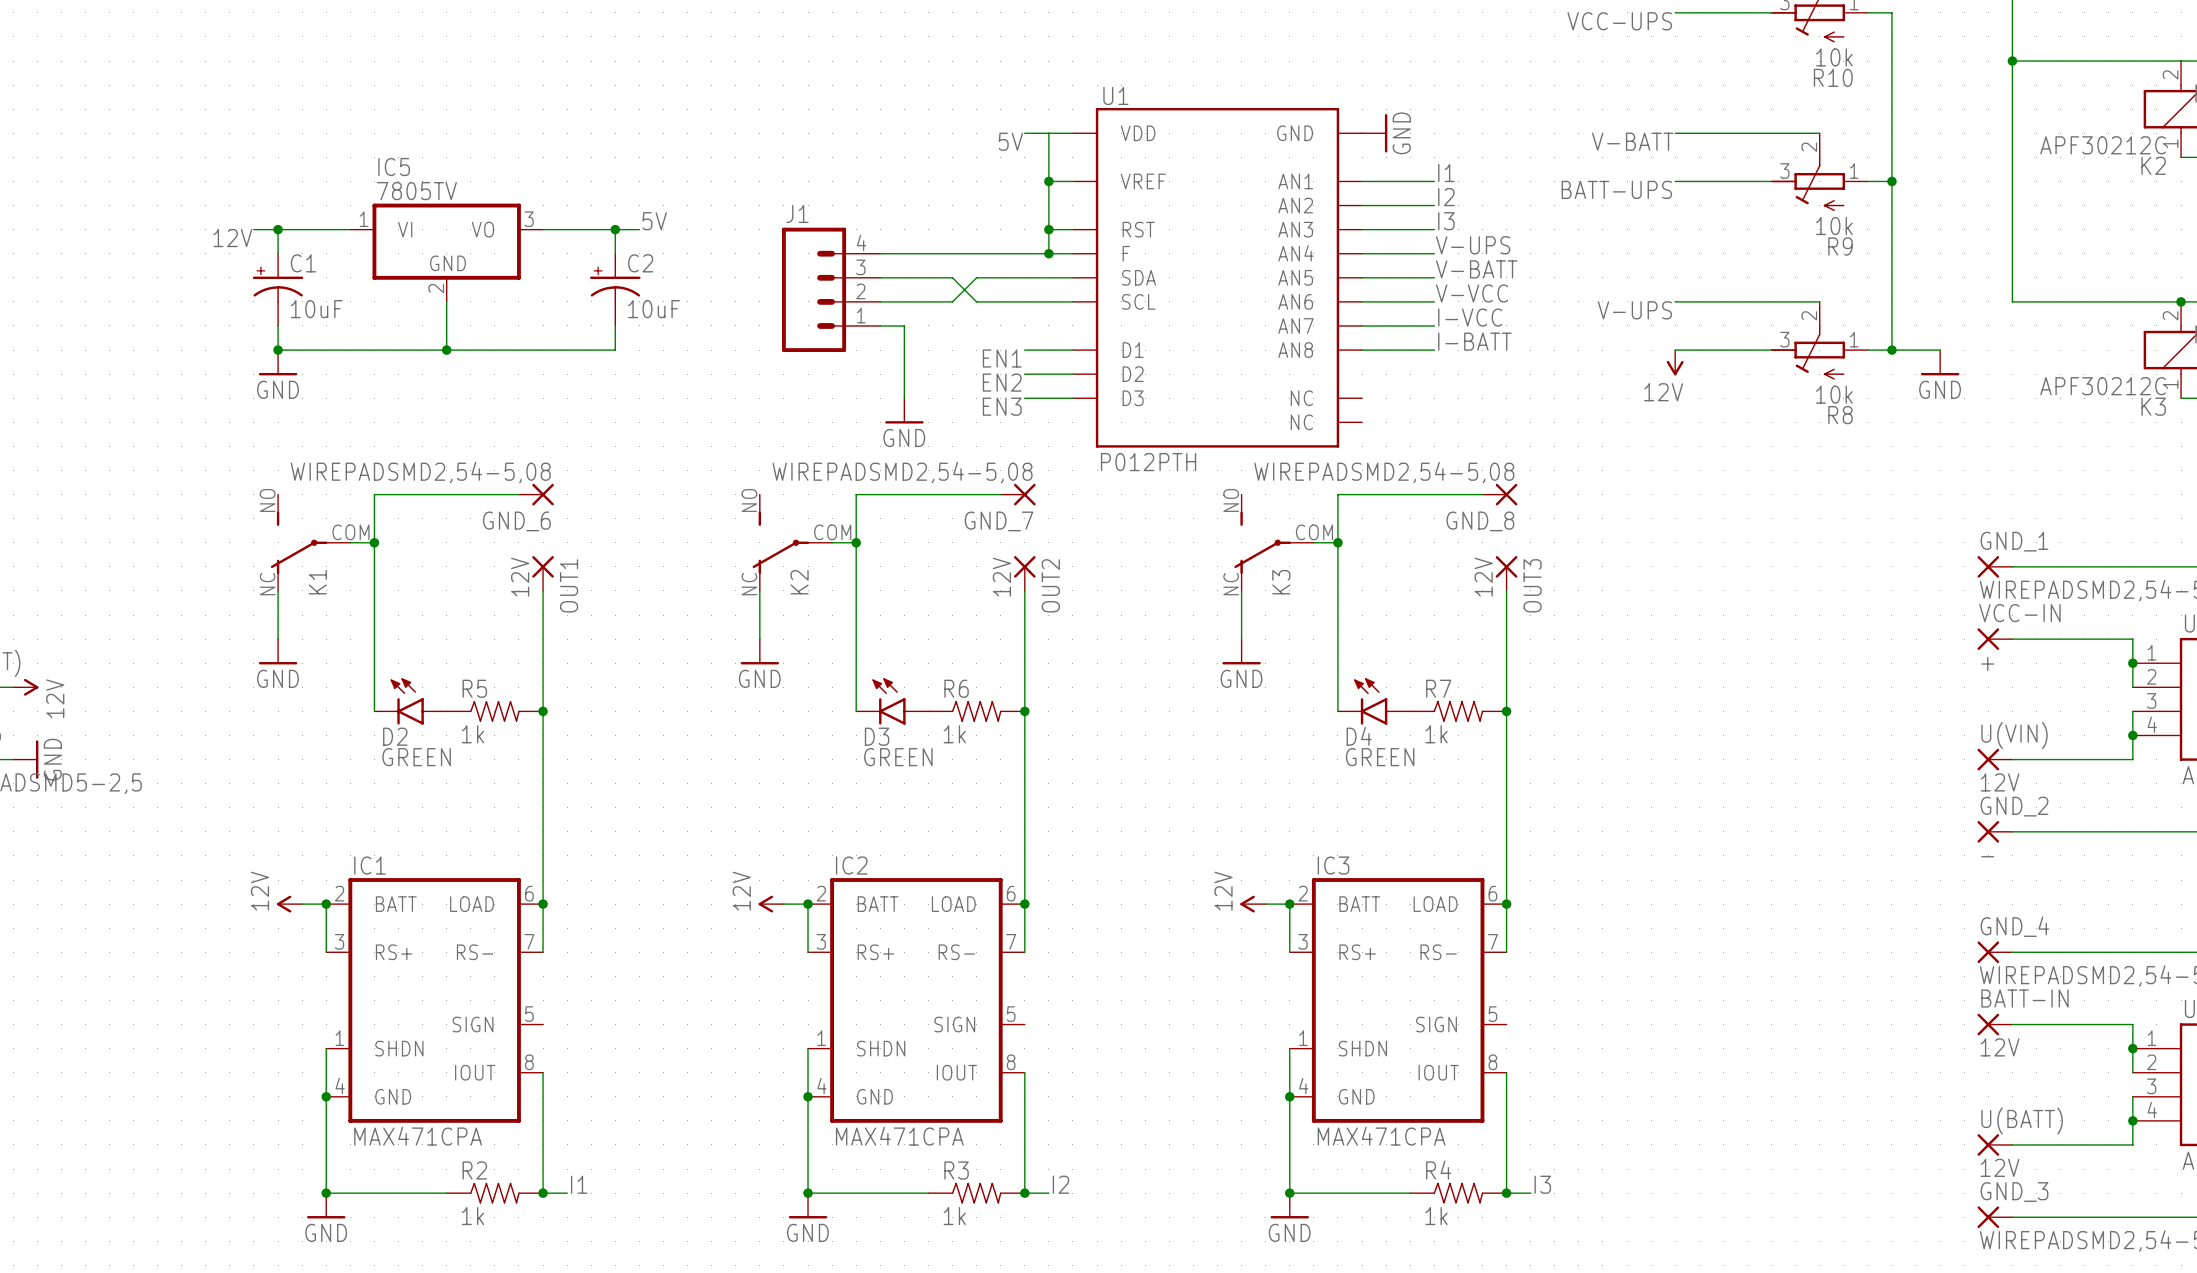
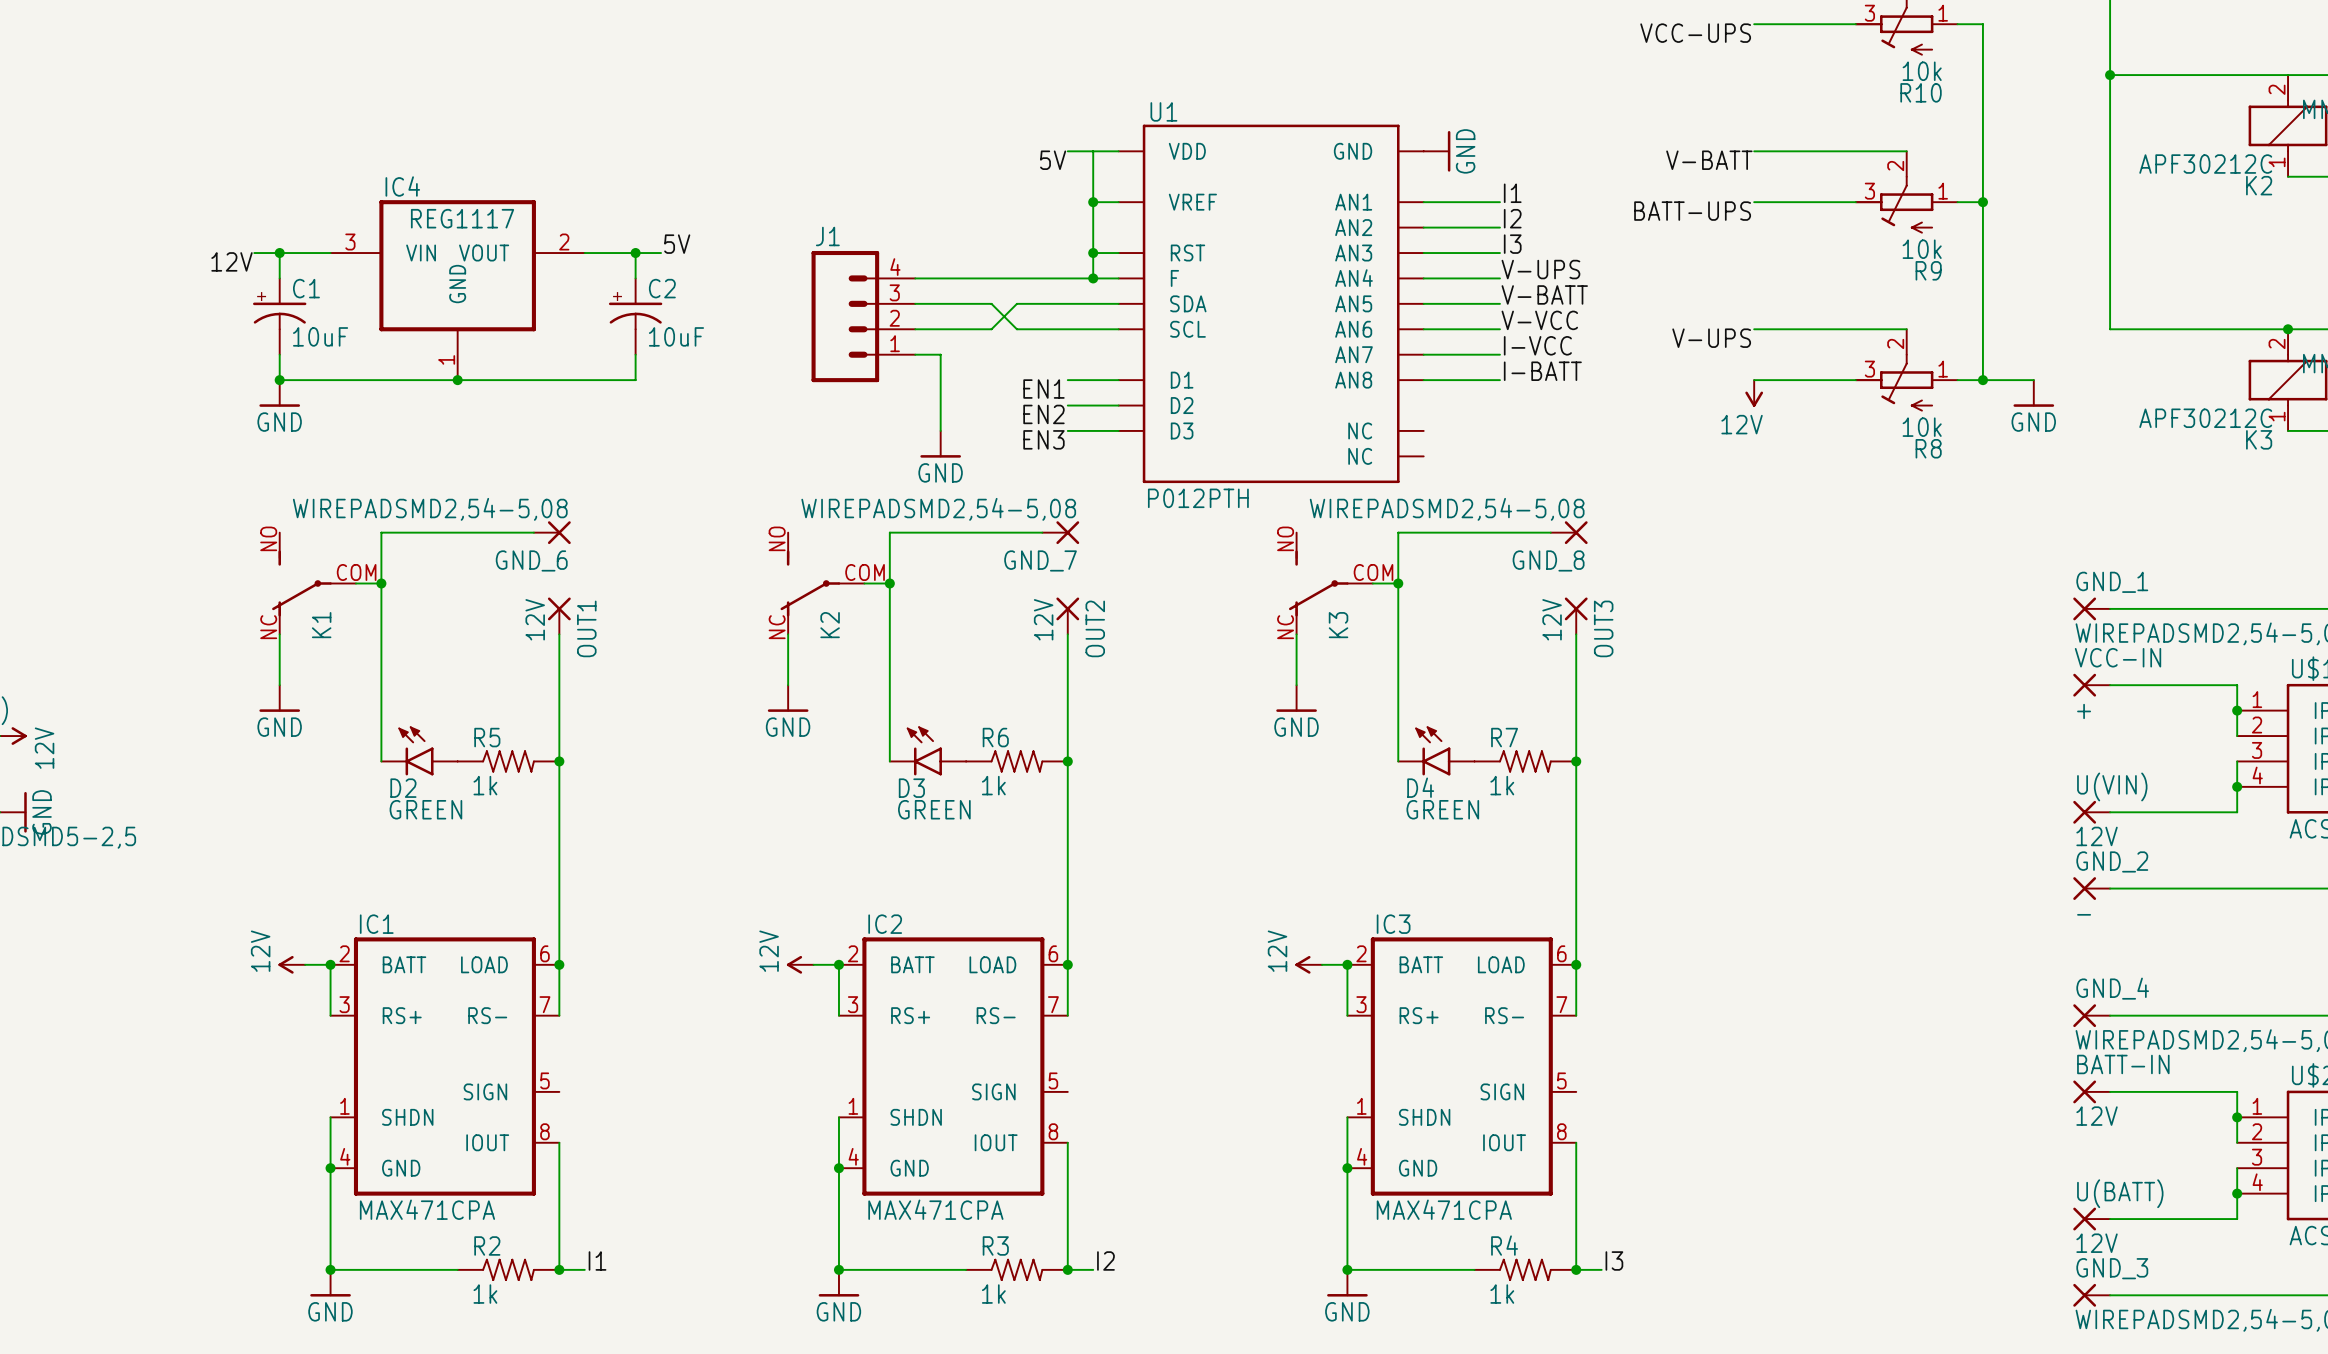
IC5: 7805TV (446, 252) -> none
IC4: none -> REG1117 (457, 290)

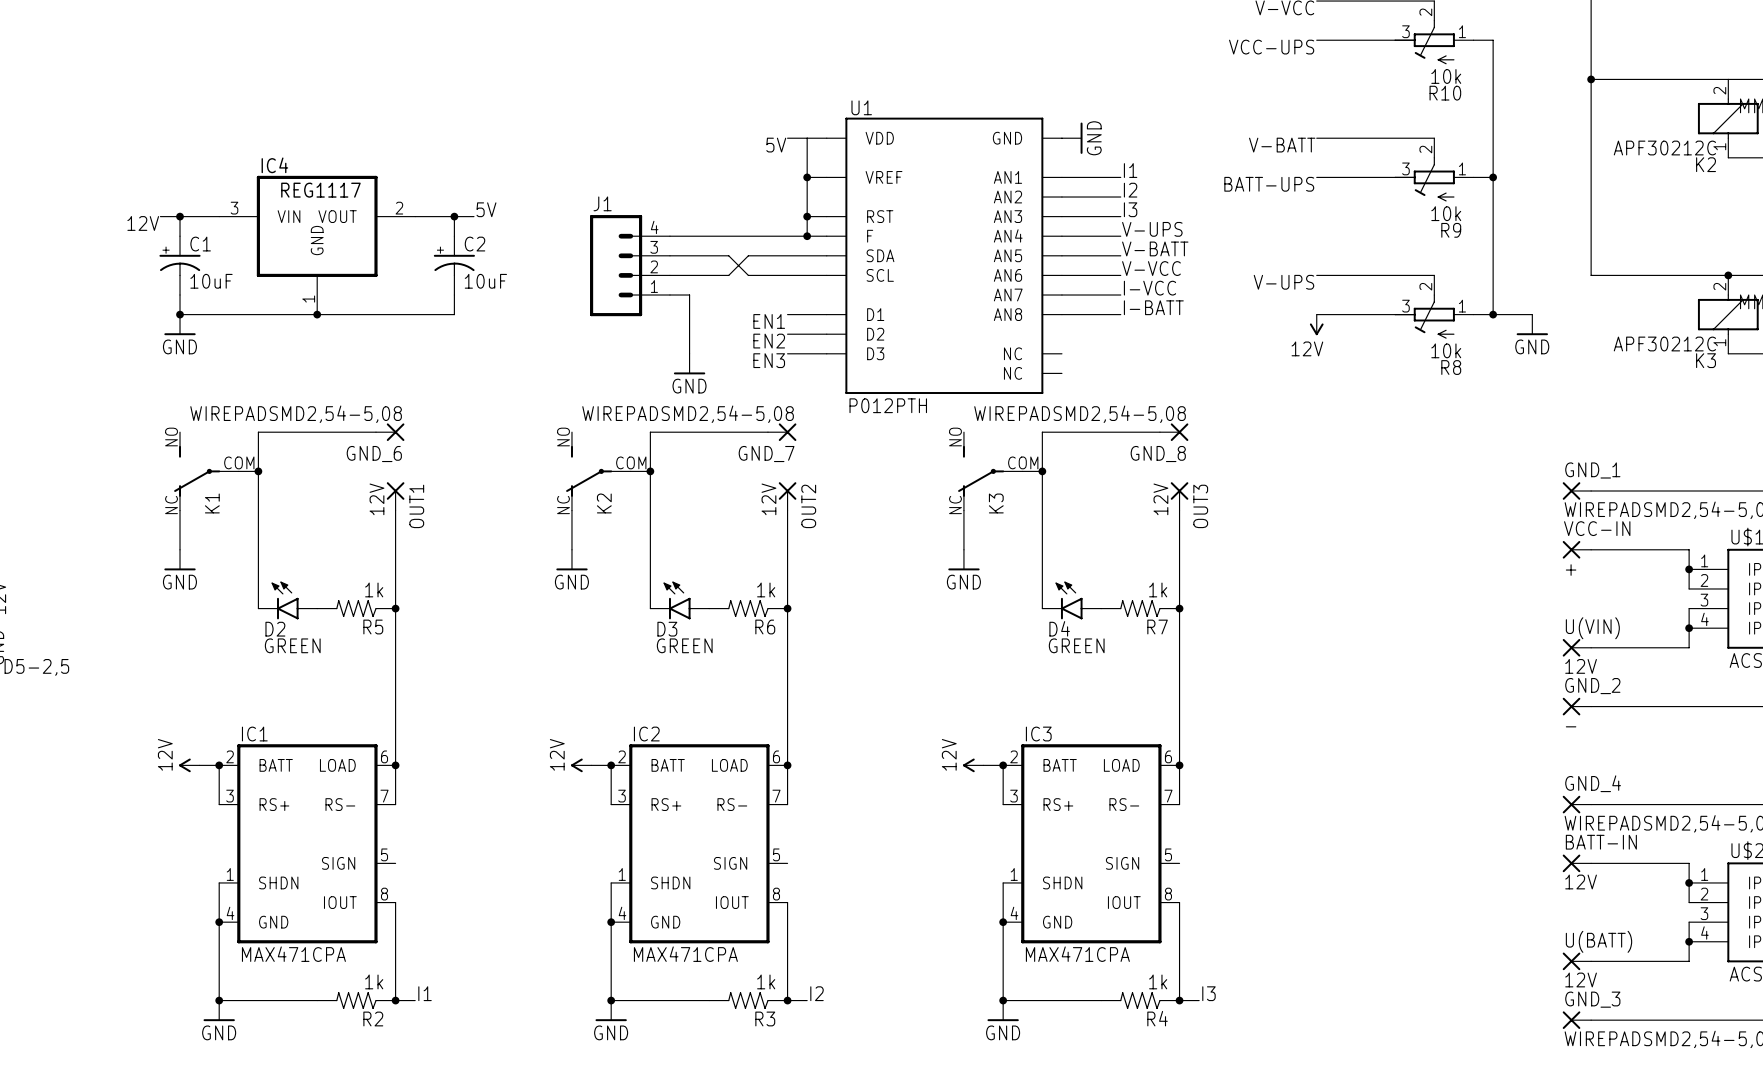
R5 rotation: 0° (508, 761) -> 180° (356, 608)
R6 rotation: 0° (1016, 761) -> 180° (748, 608)
R7 rotation: 0° (1525, 761) -> 180° (1140, 608)
R2 rotation: 0° (508, 1269) -> 180° (356, 1000)
R3 rotation: 0° (1016, 1269) -> 180° (748, 1000)
R4 rotation: 0° (1525, 1269) -> 180° (1140, 1000)

